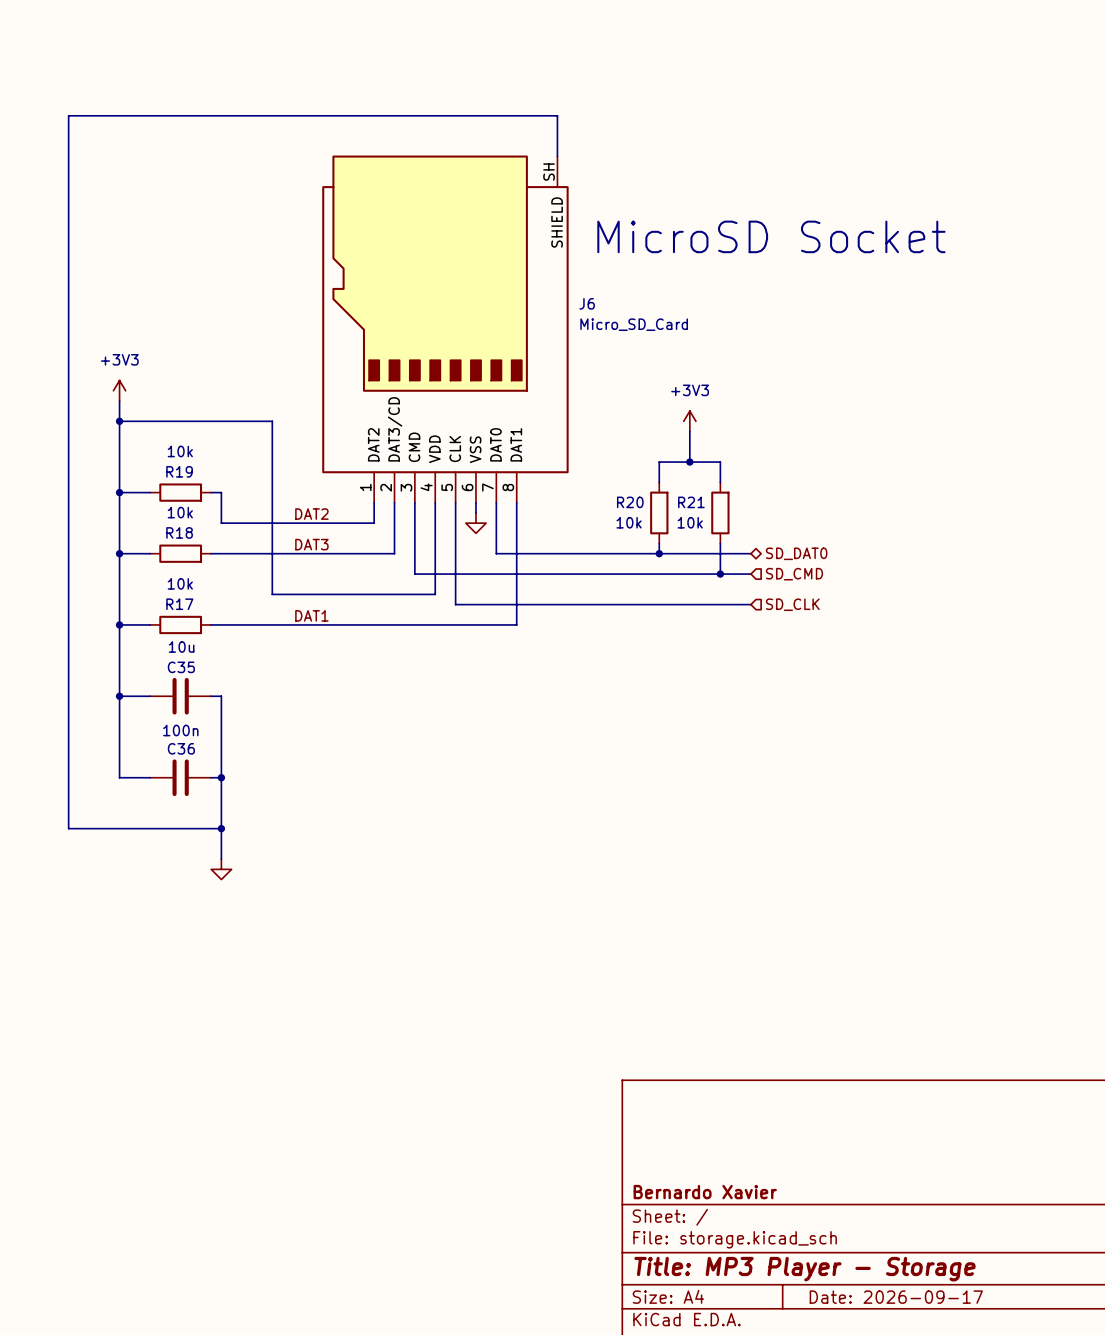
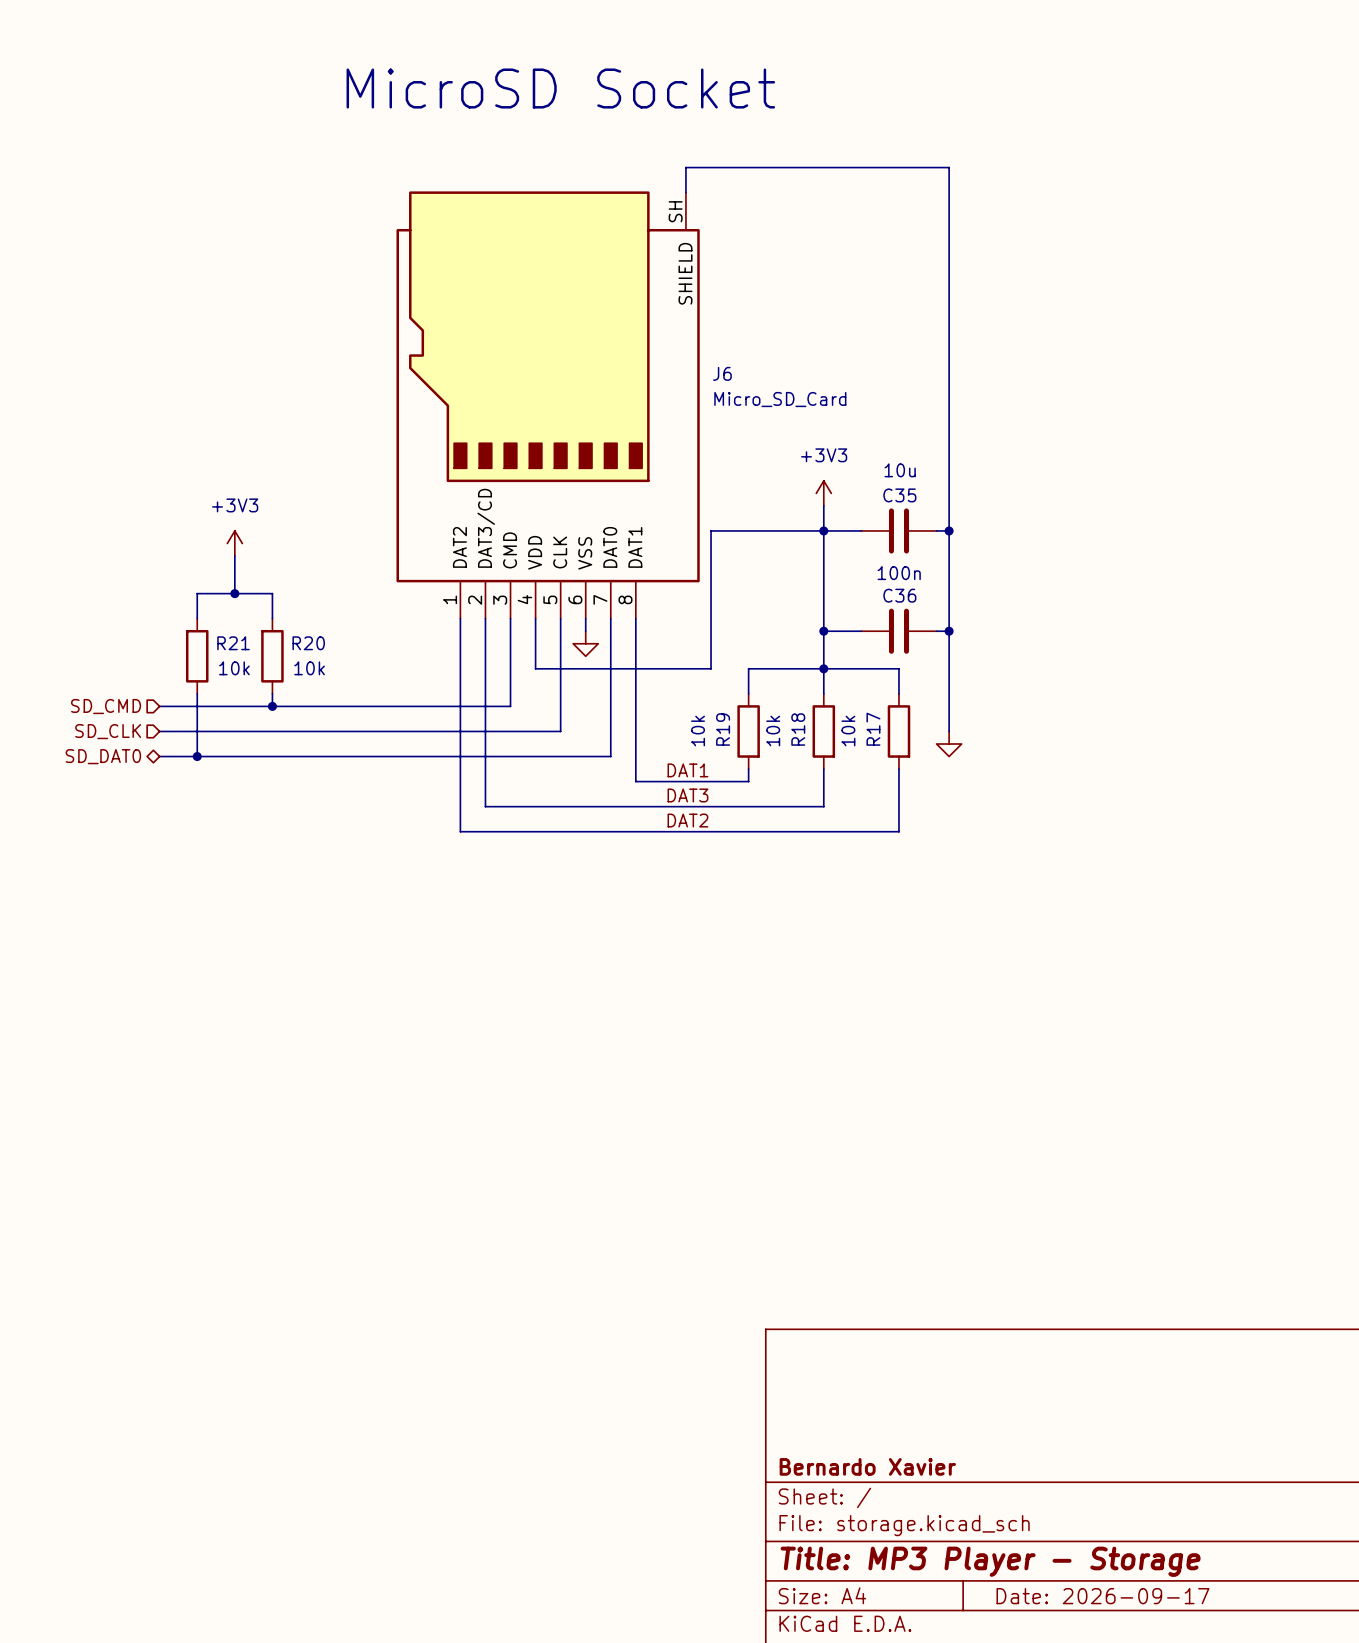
text: none -> MicroSD Socket (560, 88)
wire: (557, 136) (557, 115) (68, 115) (68, 828) (221, 828) -> (685, 167) (949, 167) (949, 731)
text: MicroSD Socket (771, 236) -> none
power symbol position: +3V3 (119, 390) -> +3V3 (234, 543)
wire: (119, 400) (119, 777) (150, 777) -> none
wire: none -> (823, 505) (823, 693)
wire: (119, 421) (272, 421) (272, 594) -> (159, 731) (335, 731)
junction: (119, 421) -> none
power symbol position: +3V3 (689, 421) -> +3V3 (823, 493)
junction: none -> (823, 530)
wire: (689, 431) (689, 462) -> none
wire: none -> (861, 530) (711, 530) (711, 668) (535, 668)
wire: none -> (936, 530) (949, 530)
junction: none -> (949, 530)
R19 value position: 10k (180, 451) -> 10k (698, 731)
wire: none -> (234, 556) (234, 593)
junction: (689, 462) -> none
R19 name position: R19 (179, 471) -> R19 (723, 729)
junction: none -> (234, 593)
wire: (659, 482) (659, 462) (720, 462) (720, 482) -> none
wire: (119, 492) (150, 492) -> none
junction: (119, 492) -> none
R19 rotation: 0° (180, 492) -> 90° clockwise (748, 731)
R19 position: (180, 492) -> (748, 731)
wire: (211, 492) (221, 492) -> (197, 618) (197, 593) (272, 593) (272, 606)
wire: (221, 502) (221, 523) (374, 523) -> (898, 769) (898, 831) (460, 831) (460, 643)
R20 name position: R20 (630, 502) -> R20 (308, 643)
R21 name position: R21 (691, 502) -> R21 (233, 643)
R18 value position: 10k (180, 512) -> 10k (773, 731)
R20 position: (659, 512) -> (272, 656)
wire: none -> (823, 631) (861, 631)
junction: none -> (823, 631)
R21 position: (720, 512) -> (197, 656)
wire: none -> (936, 631) (949, 631)
junction: none -> (949, 631)
label: DAT2 (311, 514) -> none
R20 value position: 10k (629, 522) -> 10k (309, 668)
R21 value position: 10k (690, 522) -> 10k (234, 668)
R18 name position: R18 (179, 532) -> R18 (798, 729)
wire: (435, 543) (435, 594) -> (560, 731) (535, 731)
wire: (659, 543) (659, 553) -> none
wire: (720, 543) (720, 574) -> none
label: DAT3 (311, 544) -> none
wire: (119, 553) (150, 553) -> none
junction: (119, 553) -> none
R18 rotation: 0° (180, 553) -> 90° clockwise (823, 731)
R18 position: (180, 553) -> (823, 731)
wire: (211, 553) (394, 553) -> (823, 769) (823, 806) (485, 806) (485, 681)
wire: (496, 553) (750, 553) -> (610, 681) (610, 756) (159, 756)
junction position: (659, 553) -> (823, 668)
hierarchical label: SD_DAT0 (796, 553) -> none
wire: none -> (197, 693) (197, 756)
wire: none -> (272, 693) (272, 706)
wire: none -> (748, 693) (748, 668) (898, 668) (898, 693)
hierarchical label: none -> SD_CMD (106, 706)
junction: none -> (272, 706)
wire: (414, 574) (750, 574) -> (510, 706) (159, 706)
junction: (720, 574) -> none
hierarchical label: SD_CMD (794, 574) -> none
R17 value position: 10k (180, 583) -> 10k (848, 731)
hierarchical label: none -> SD_CLK (108, 731)
wire: (455, 594) (455, 604) (750, 604) -> none
R17 name position: R17 (179, 604) -> R17 (873, 729)
power symbol: none -> (949, 744)
hierarchical label: SD_CLK (792, 604) -> none
hierarchical label: none -> SD_DAT0 (103, 756)
junction: none -> (197, 756)
label: DAT1 (311, 615) -> none
wire: (119, 624) (150, 624) -> none
junction: (119, 624) -> none
R17 rotation: 0° (180, 624) -> 90° clockwise (898, 731)
R17 position: (180, 624) -> (898, 731)
wire: (211, 624) (516, 624) -> (748, 769) (748, 781) (635, 781) (635, 769)
label: none -> DAT1 (687, 770)
label: none -> DAT3 (687, 795)
label: none -> DAT2 (687, 820)
wire: (119, 696) (150, 696) -> none
junction: (119, 696) -> none
C35 position: (180, 696) -> (898, 530)
wire: (211, 696) (221, 696) (221, 859) -> none
C36 position: (180, 777) -> (898, 631)
wire: (211, 777) (221, 777) -> none
junction: (221, 777) -> none
junction: (221, 828) -> none
power symbol: (221, 869) -> none

